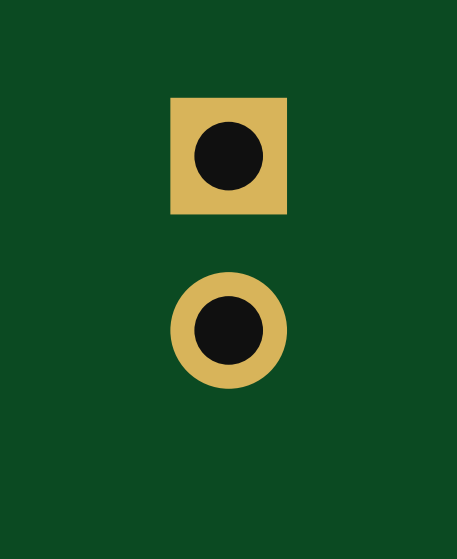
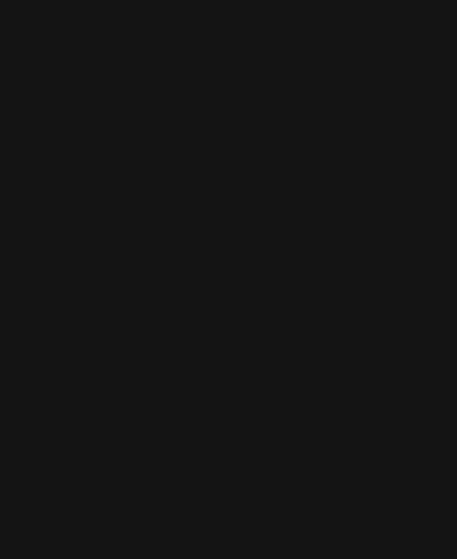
part: (228, 243) -> none

